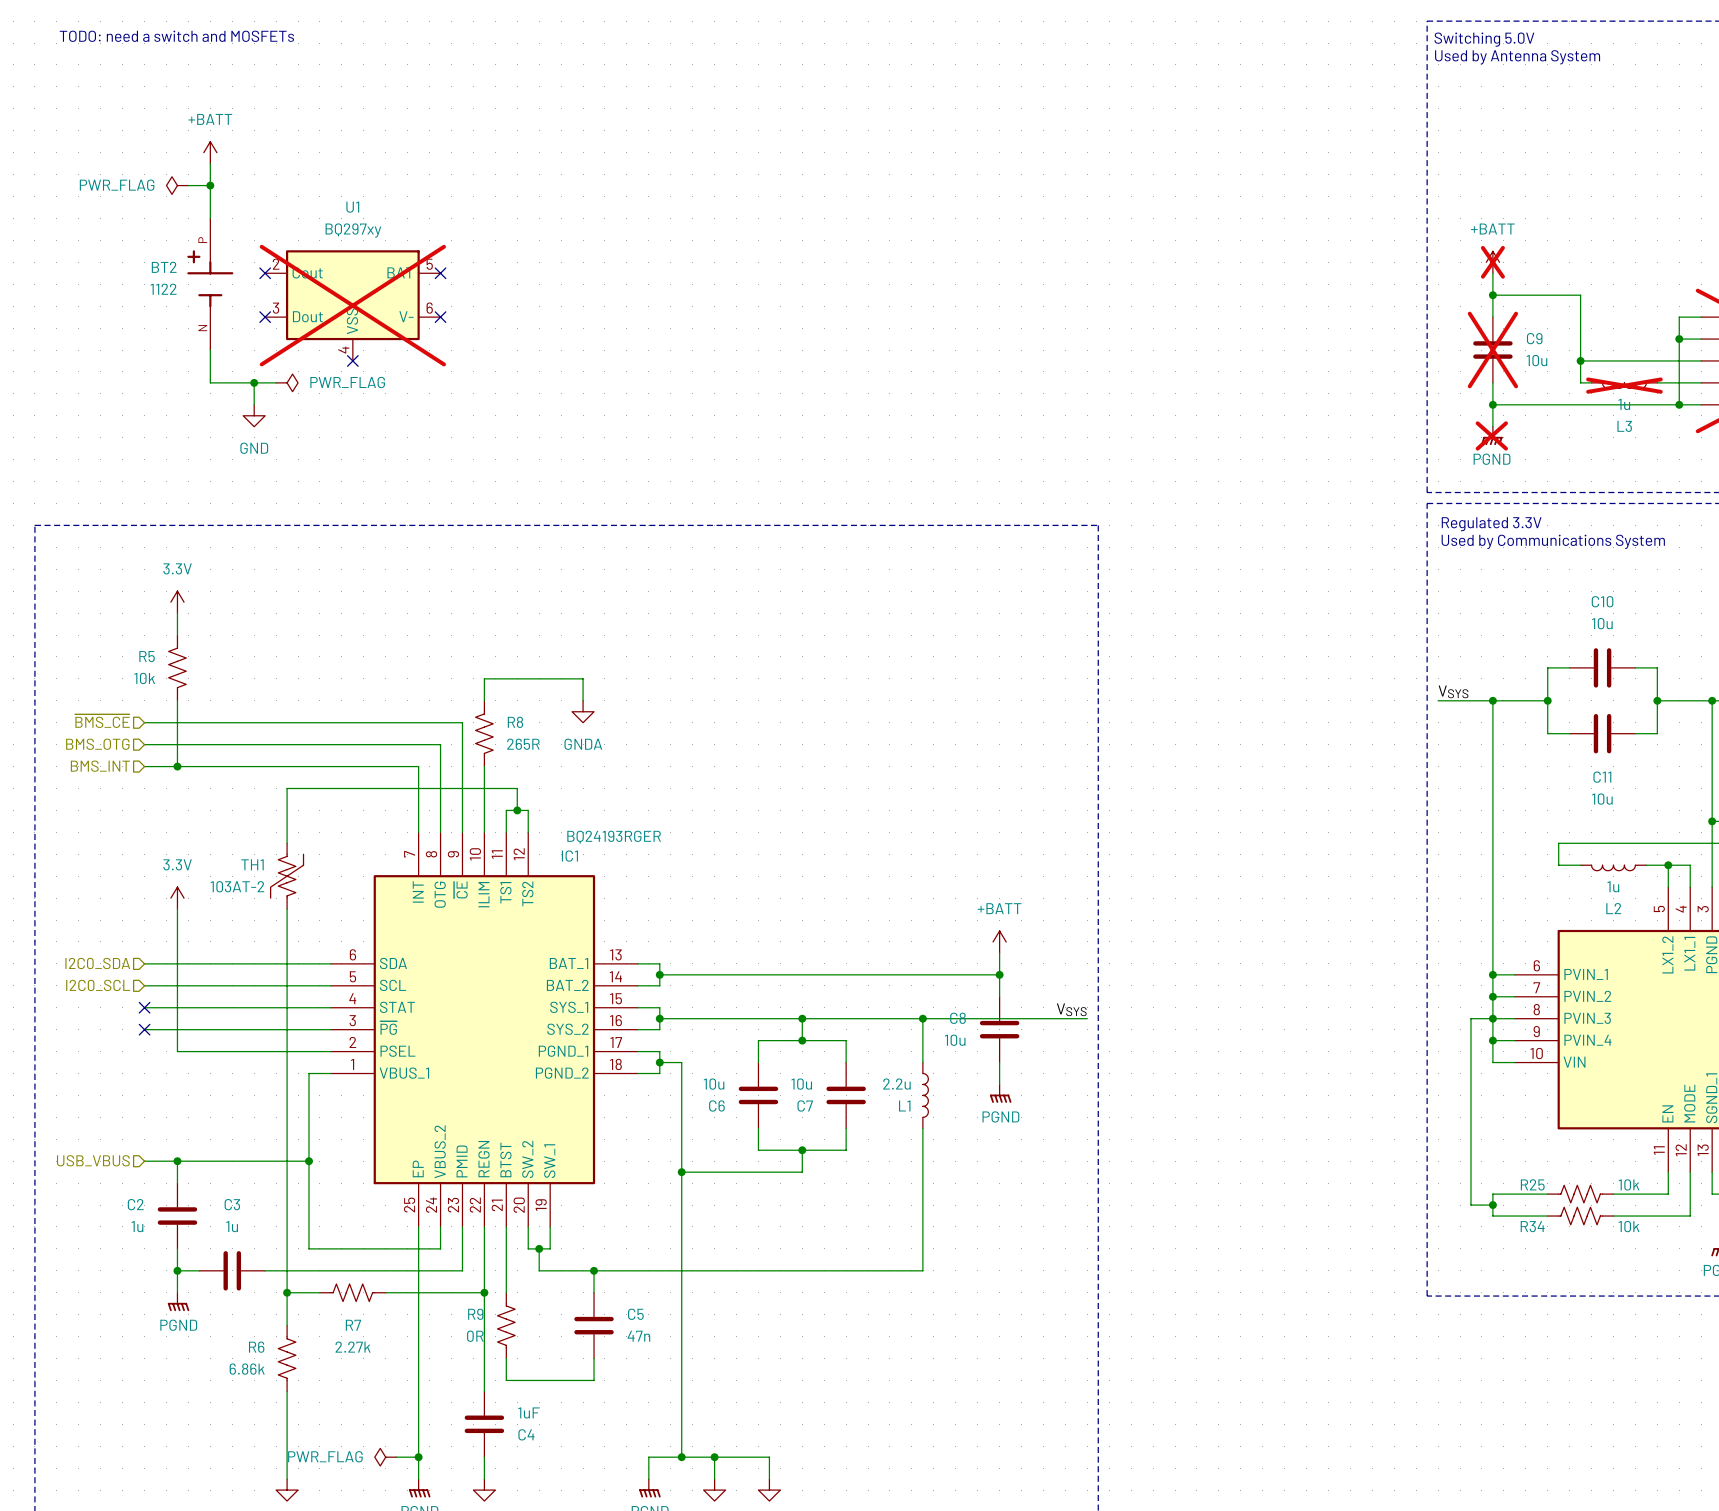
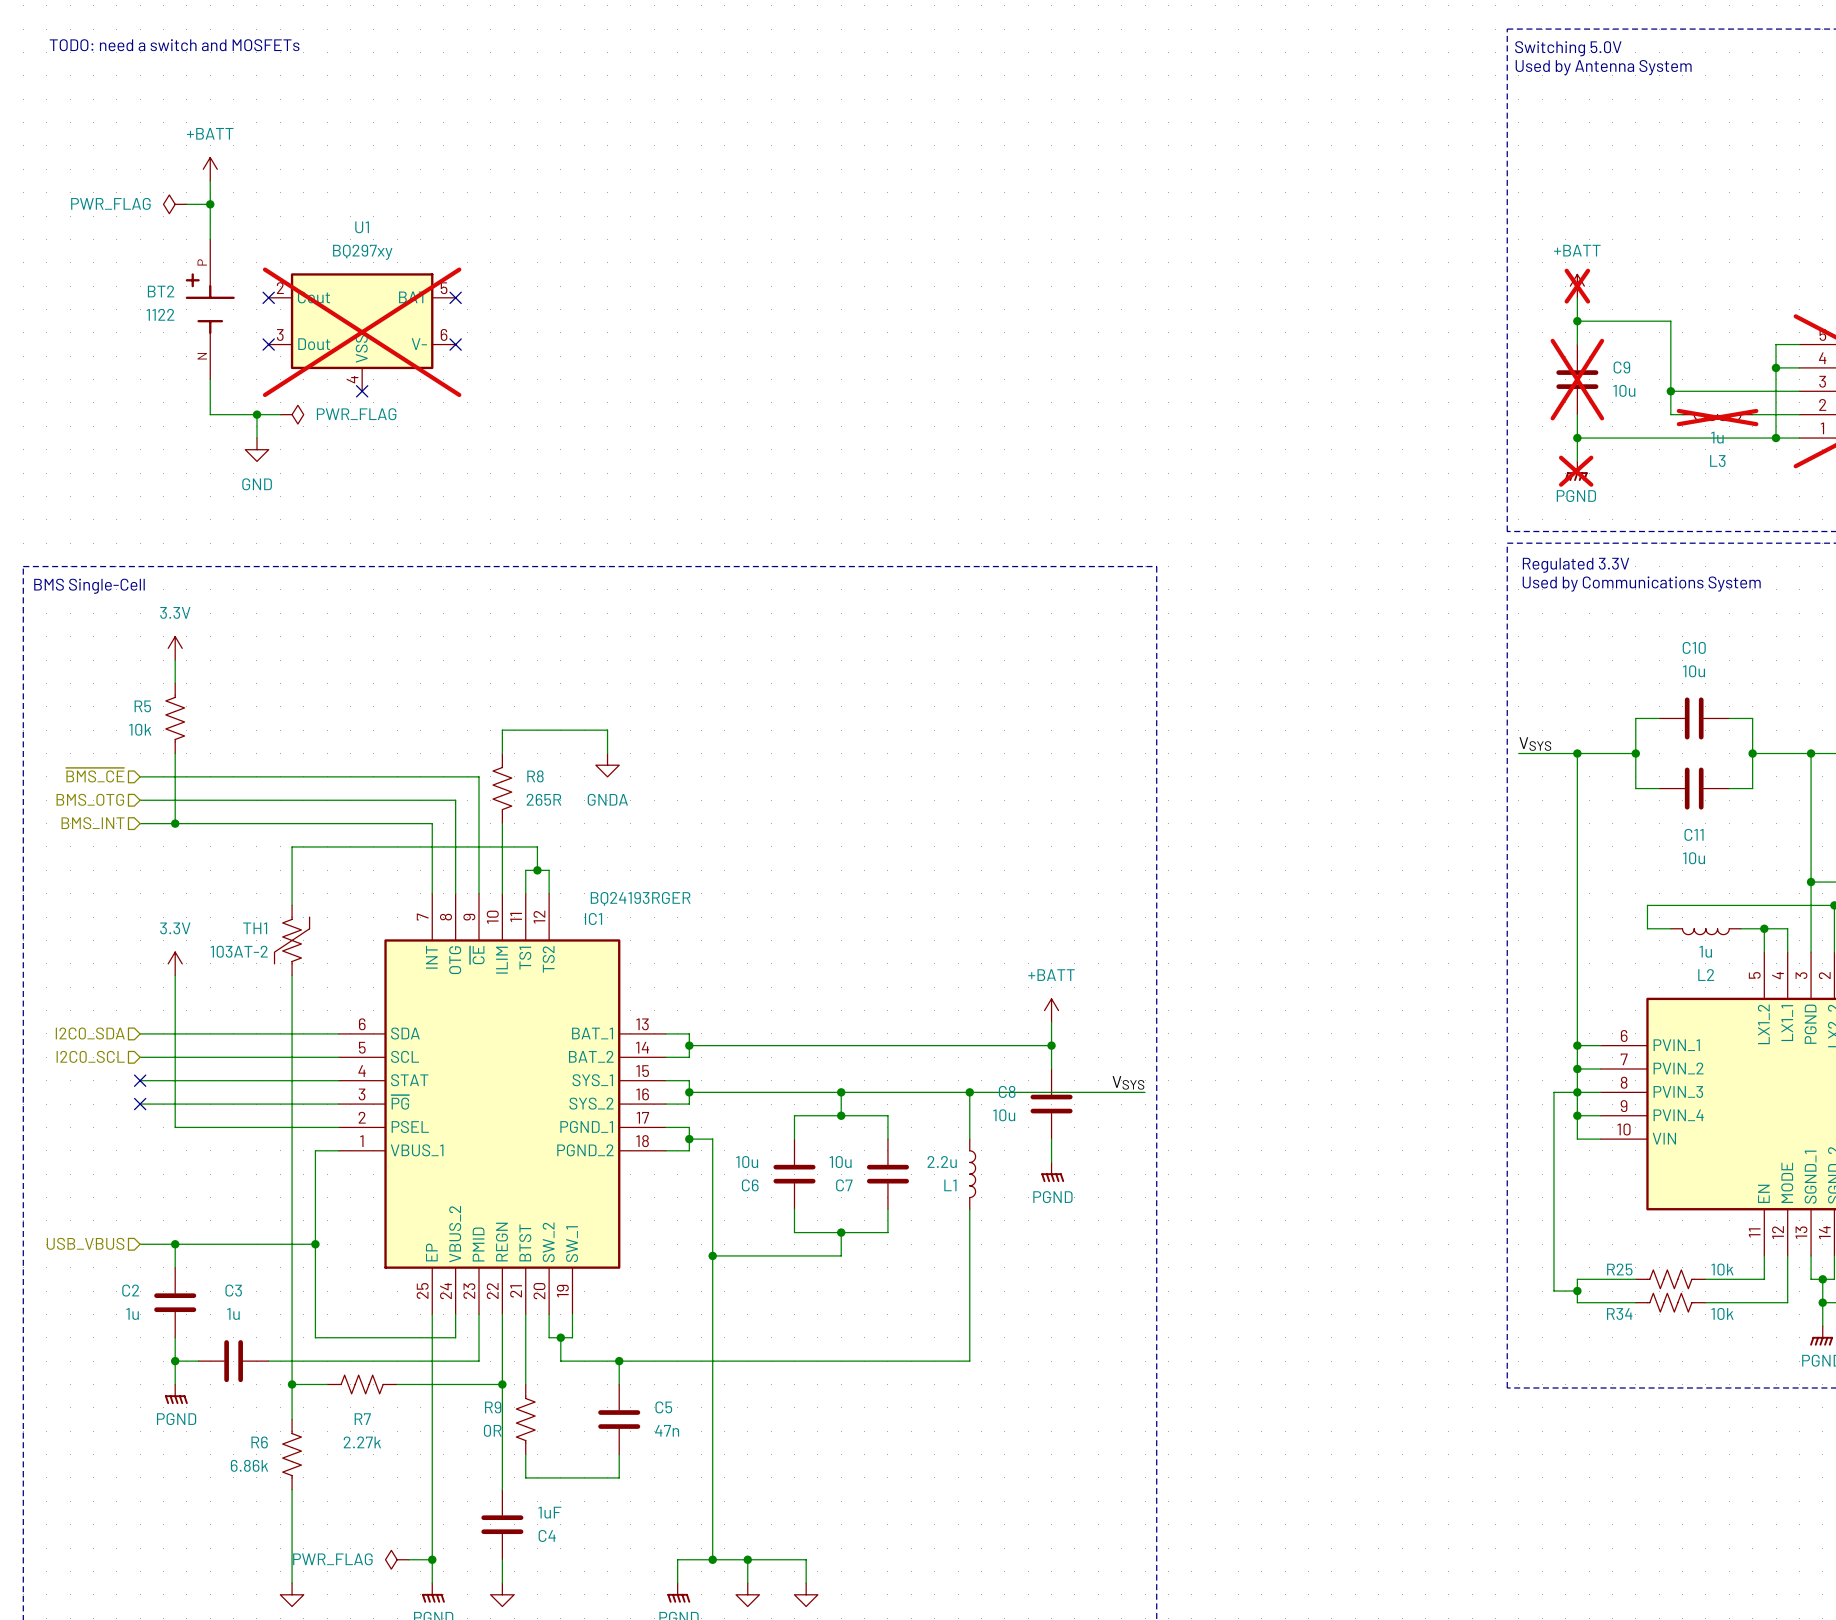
text: none -> BMS Single-Cell (89, 586)

